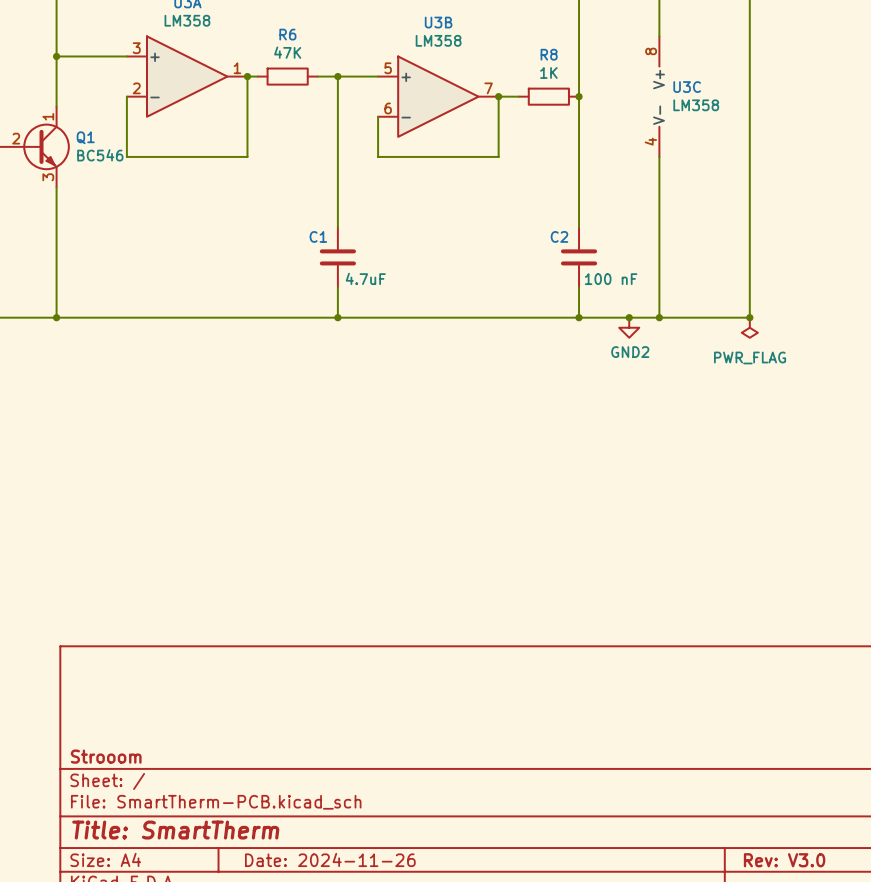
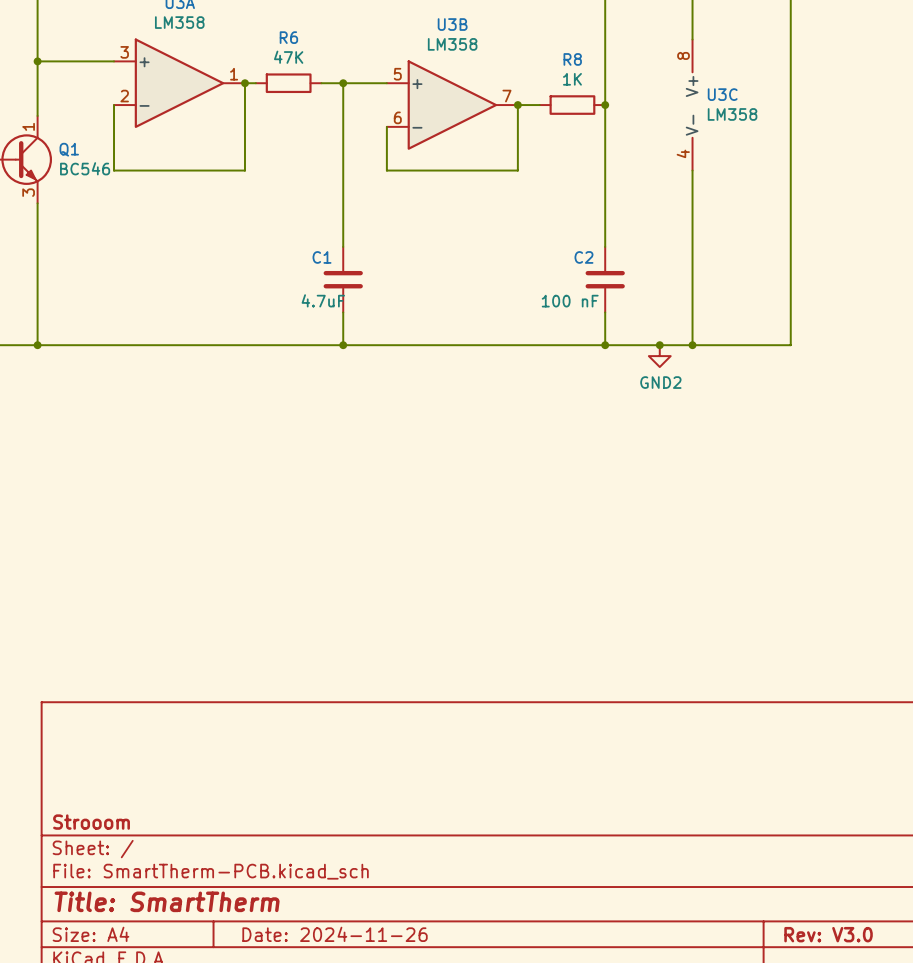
C1 value position: 4.7uF (365, 278) -> 4.7uF (323, 300)
C2 value position: 100 nF (611, 279) -> 100 nF (570, 301)
junction: (749, 317) -> none
power symbol: PWR_FLAG (749, 327) -> none

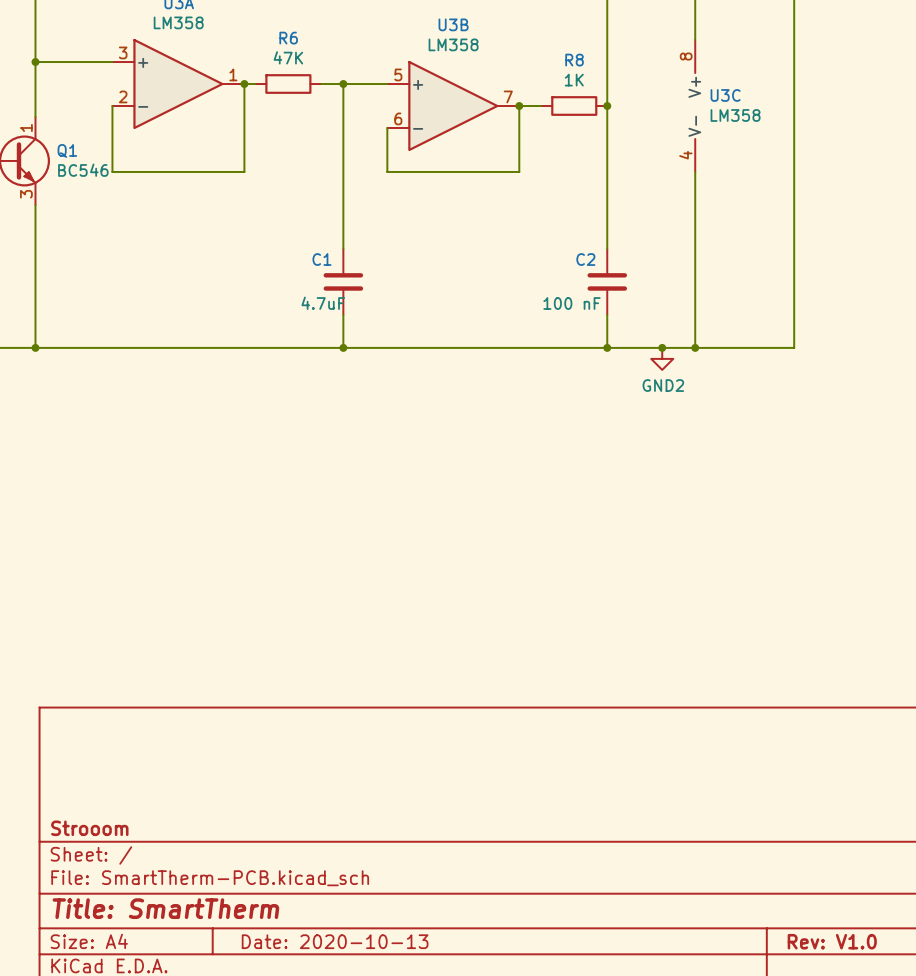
title block: Date: 2024-11-26 (335, 934) -> Date: 2020-10-13 (335, 941)
title block: Rev: V3.0 (828, 934) -> Rev: V1.0 (832, 941)

